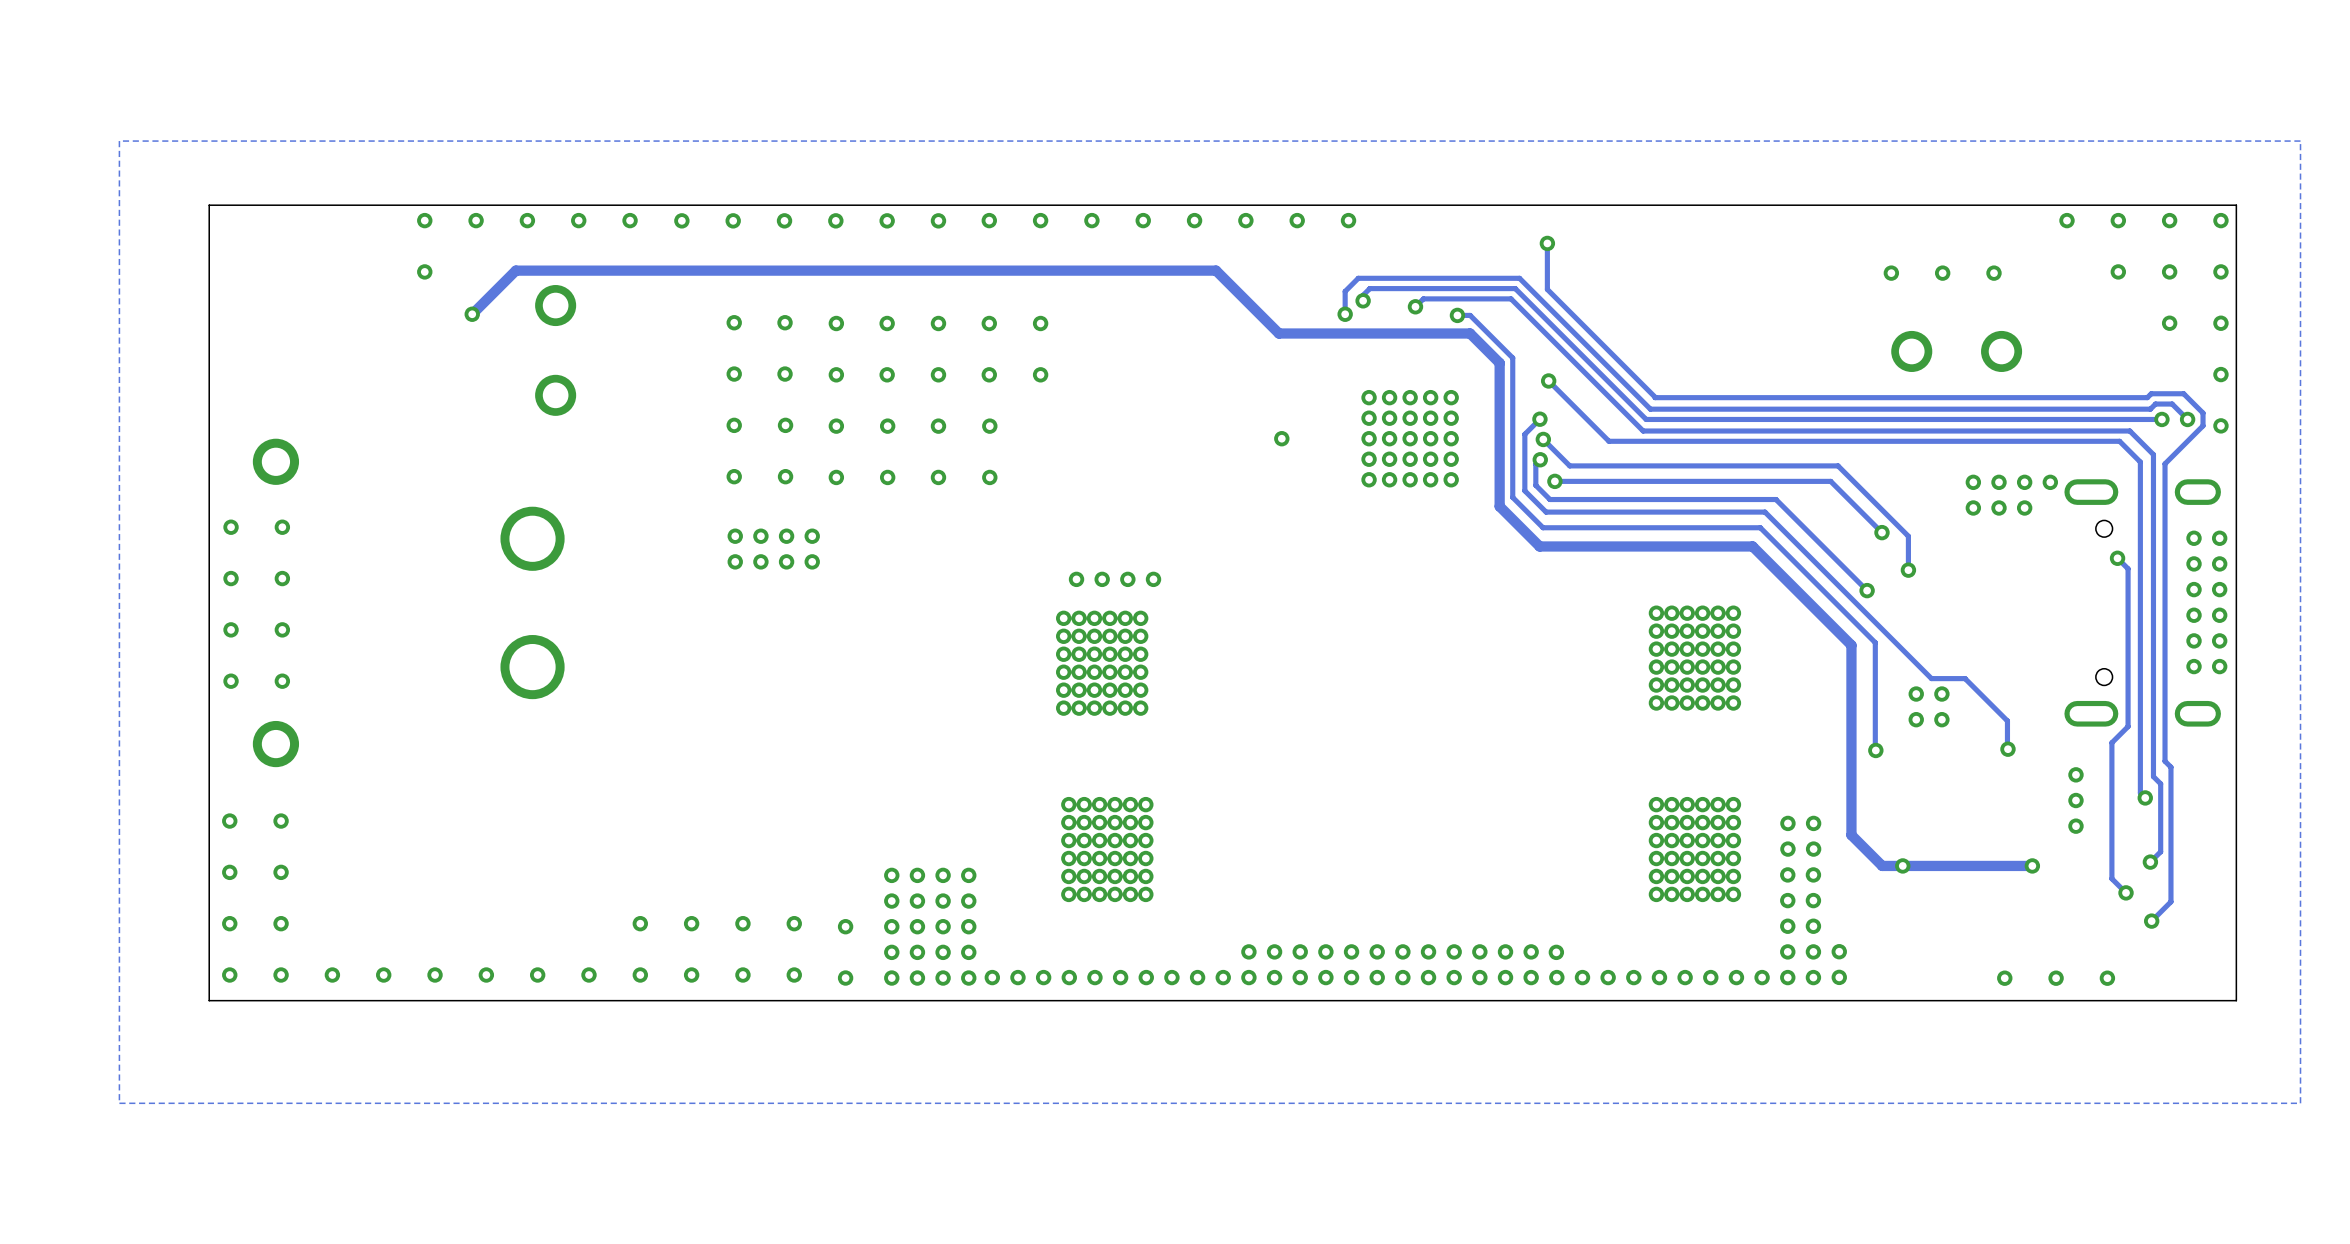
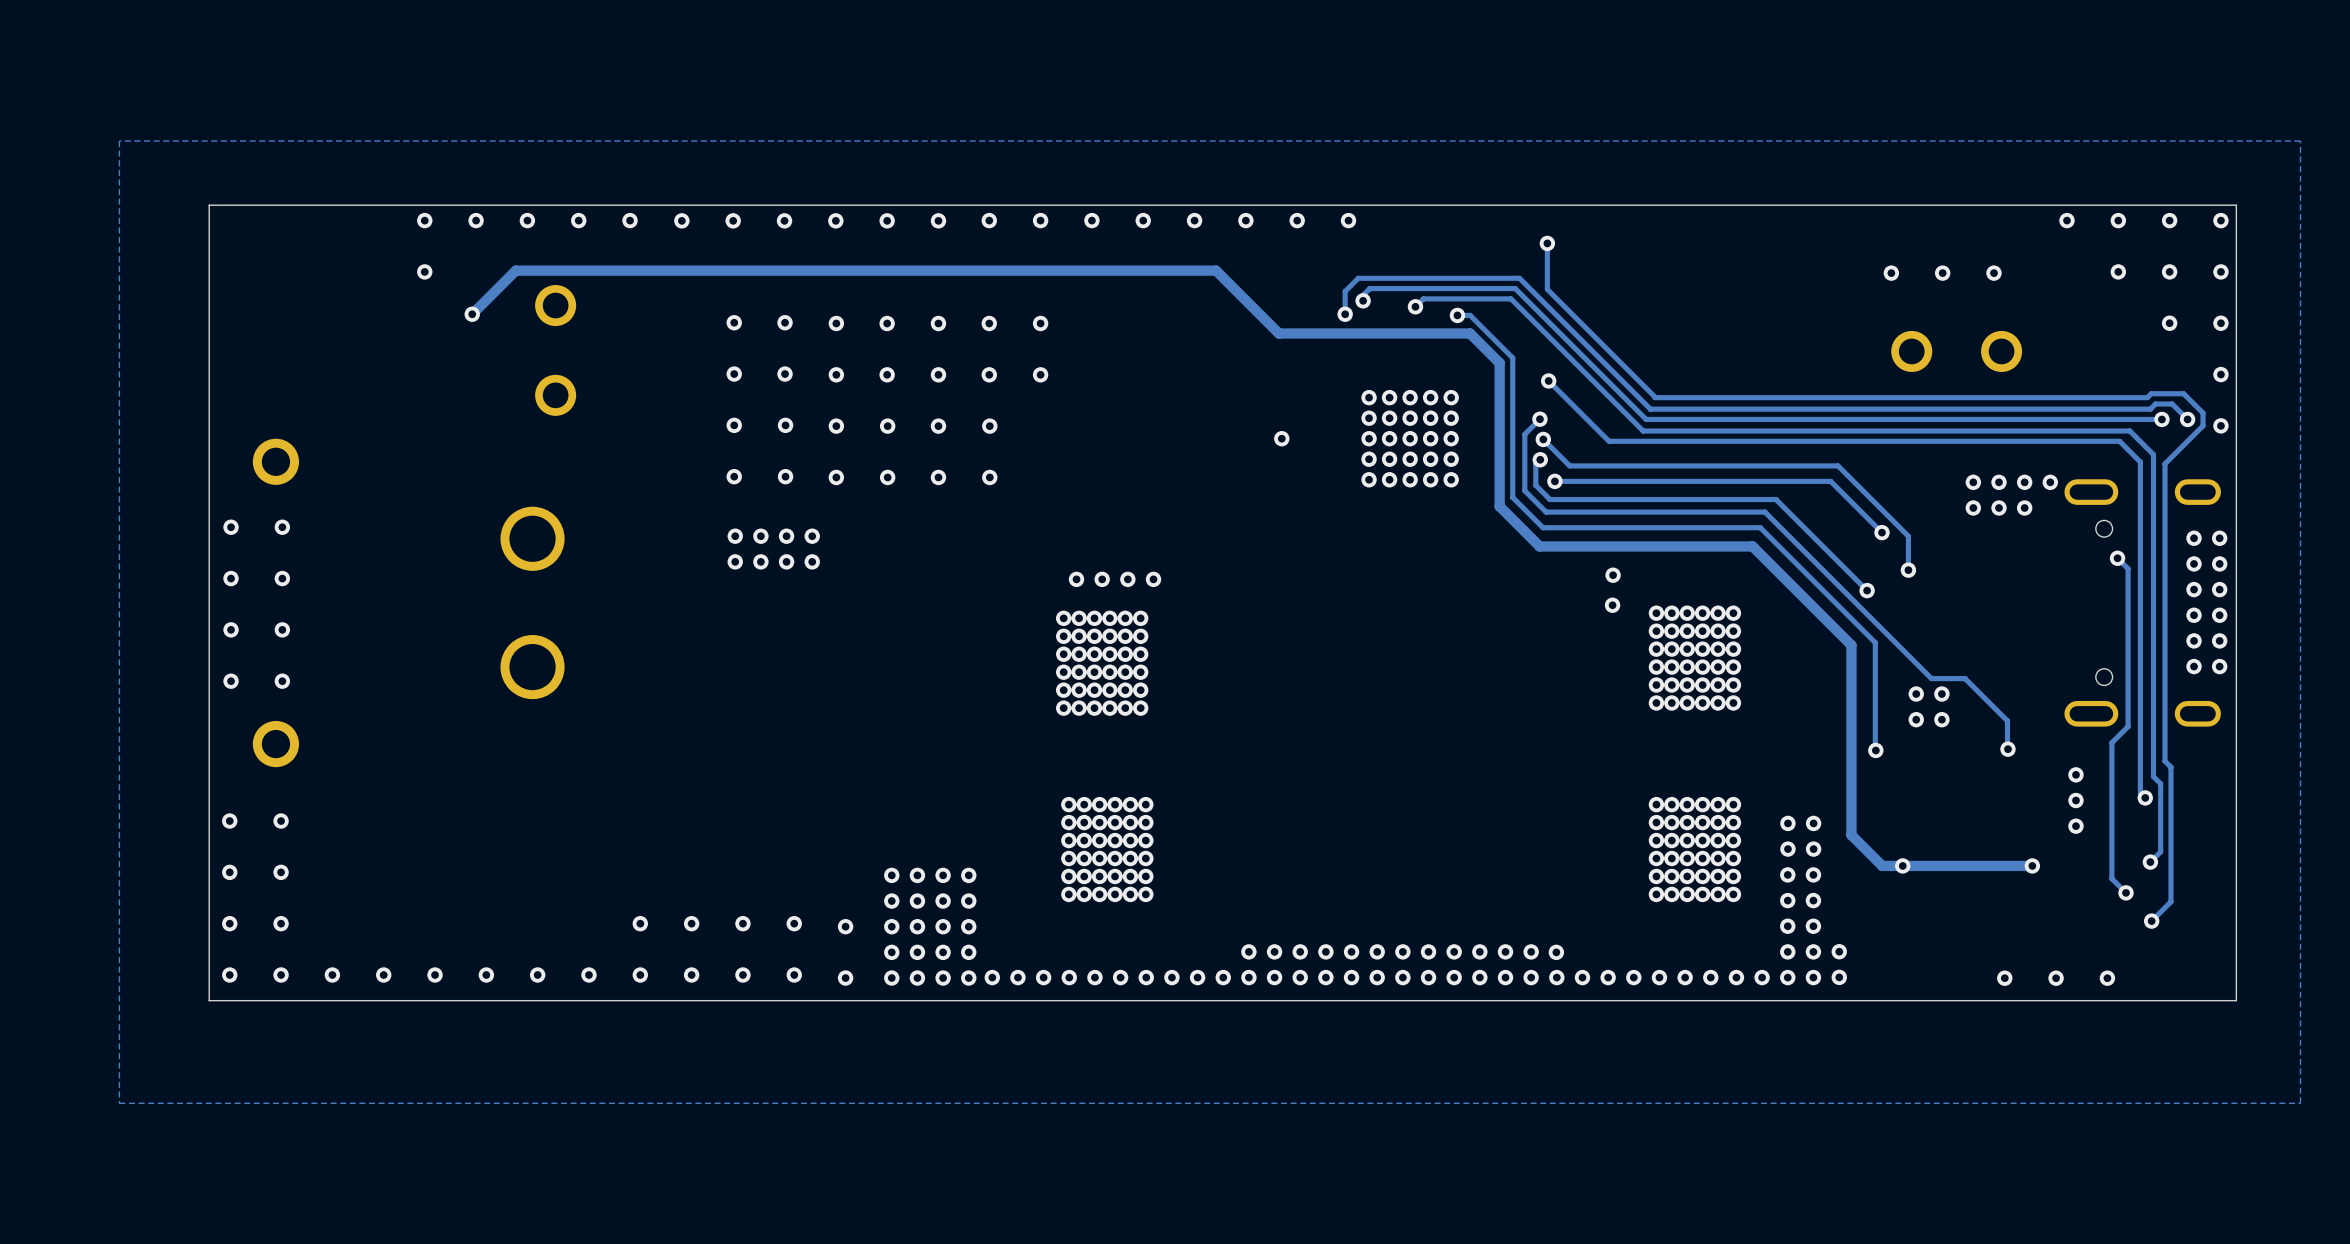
via: none -> (1613, 575)
via: none -> (1612, 605)

